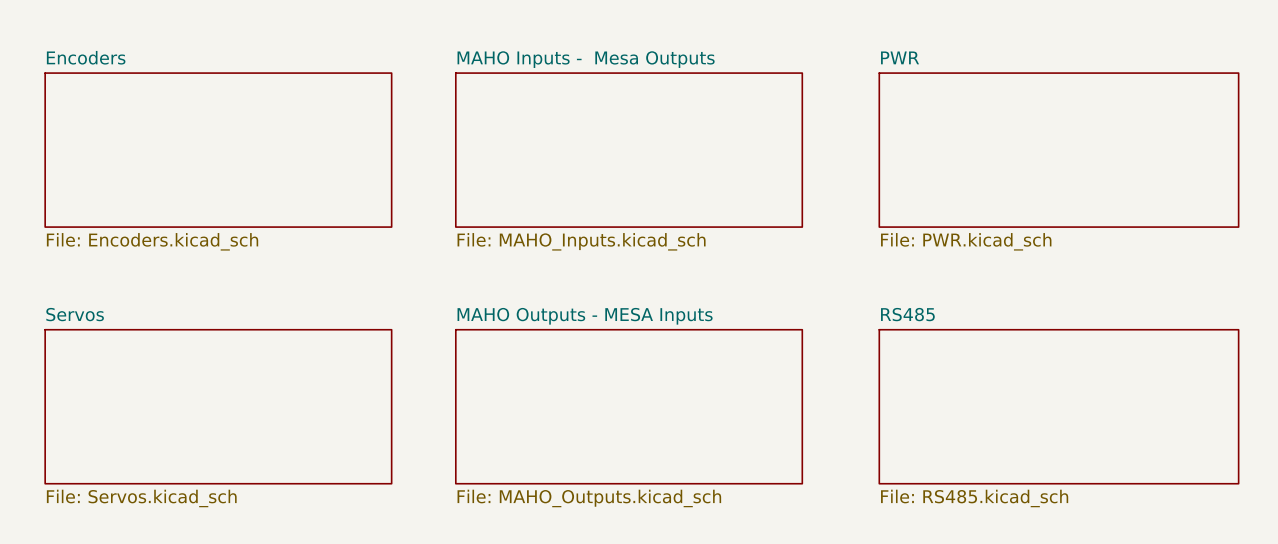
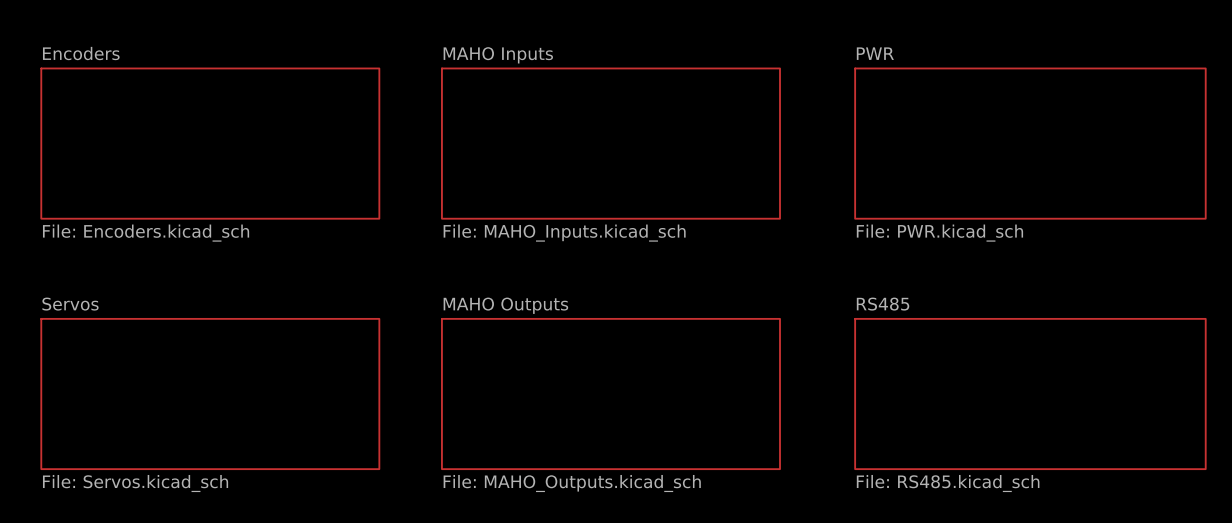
sheet MAHO Inputs - Mesa Outputs name: MAHO Inputs - Mesa Outputs (586, 59) -> MAHO Inputs (498, 55)
sheet MAHO Outputs - MESA Inputs name: MAHO Outputs - MESA Inputs (585, 316) -> MAHO Outputs (505, 305)

